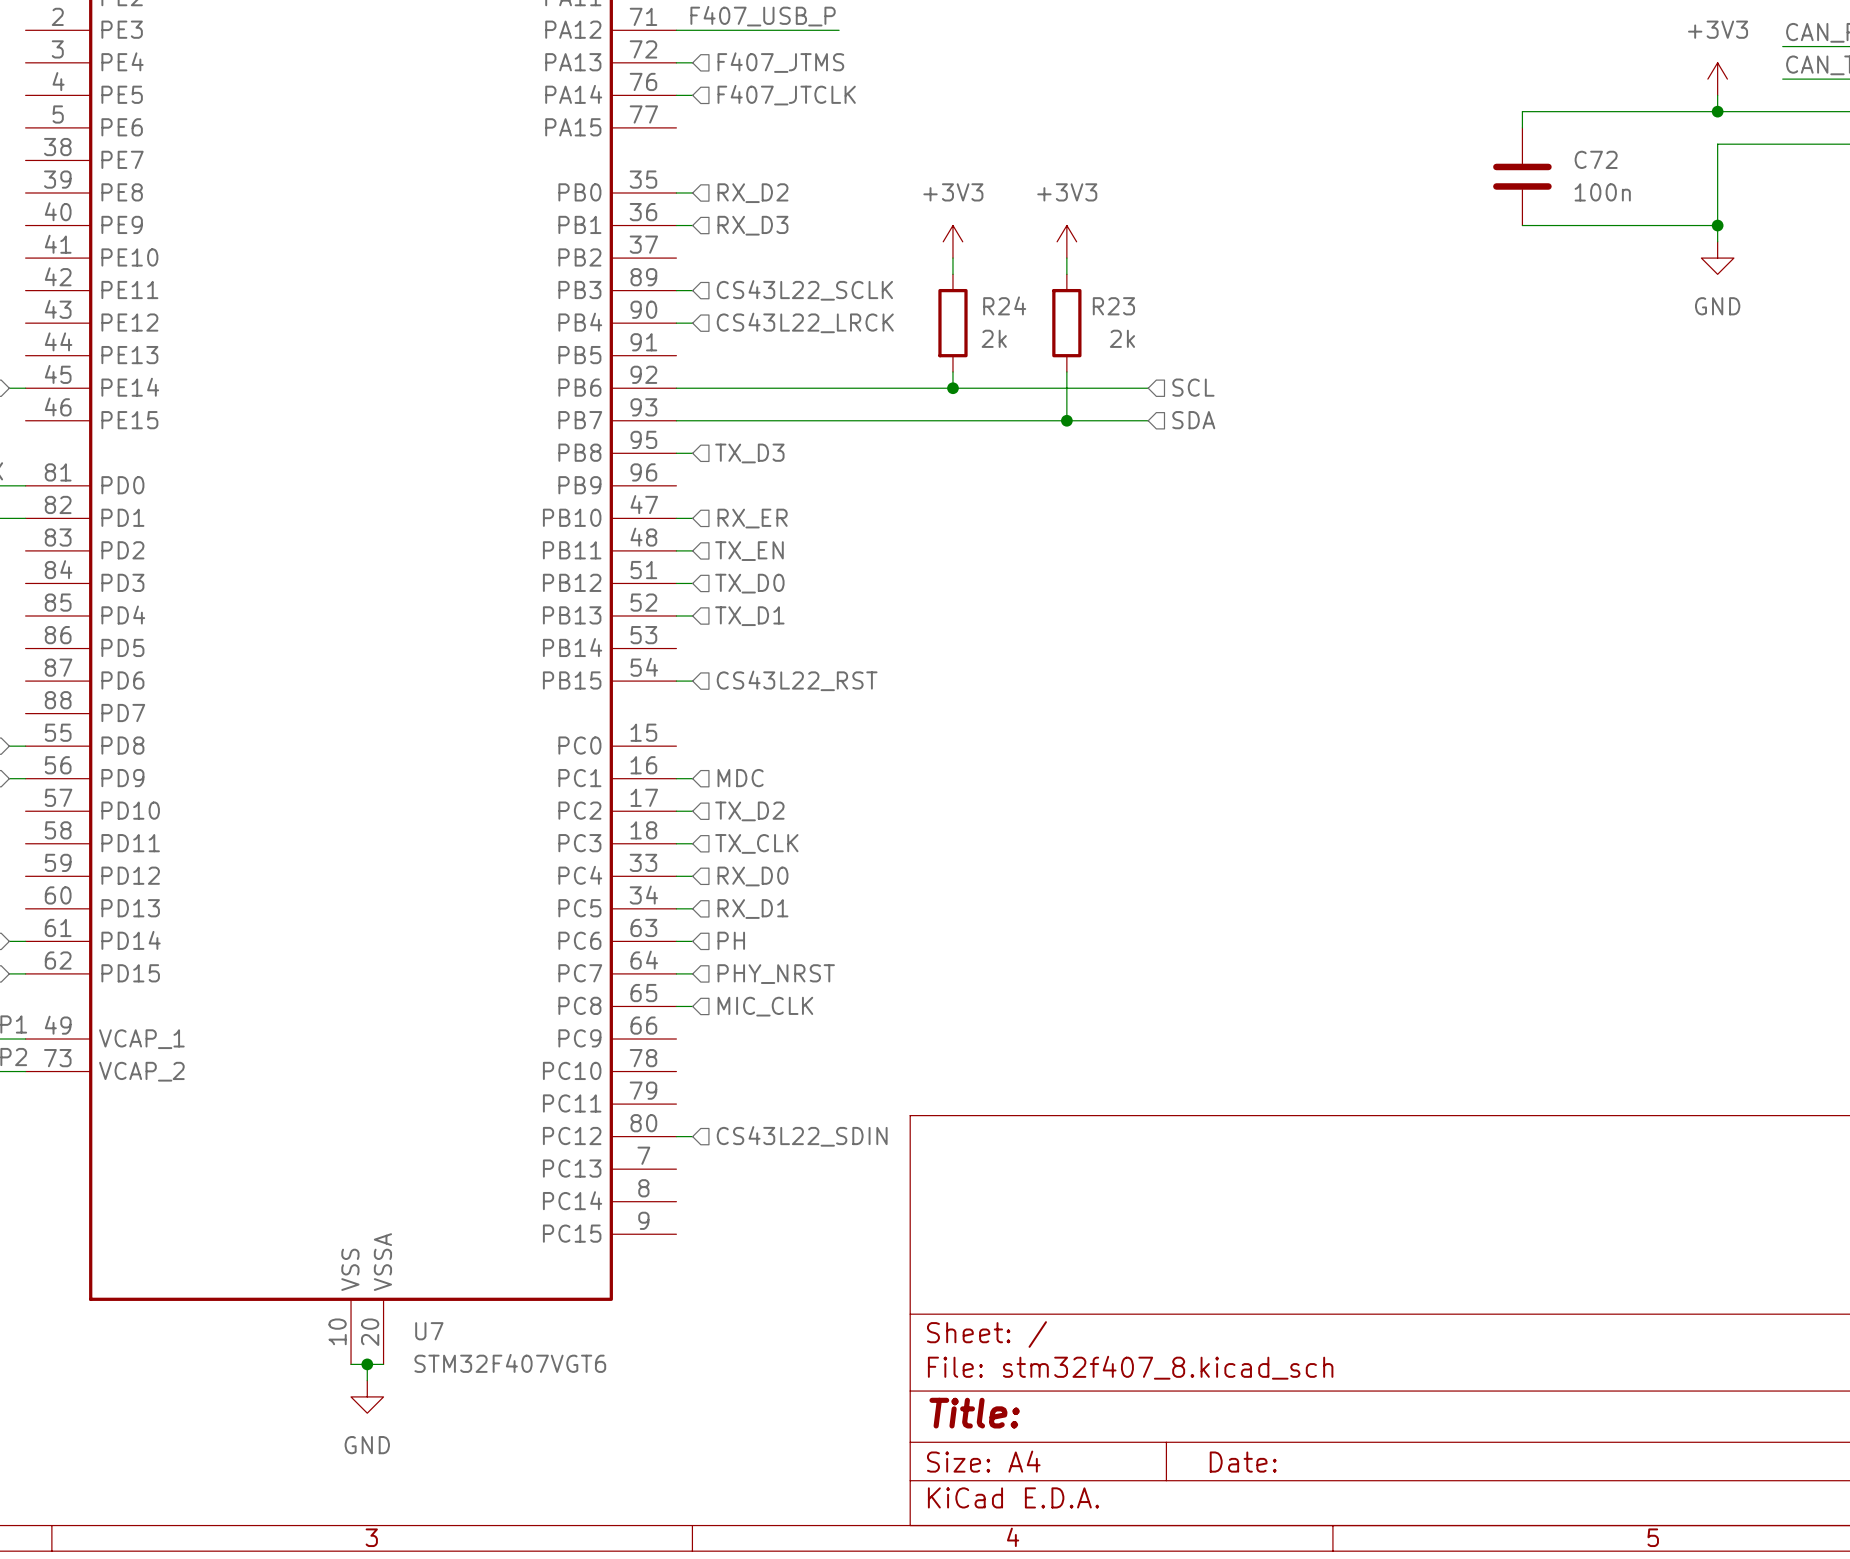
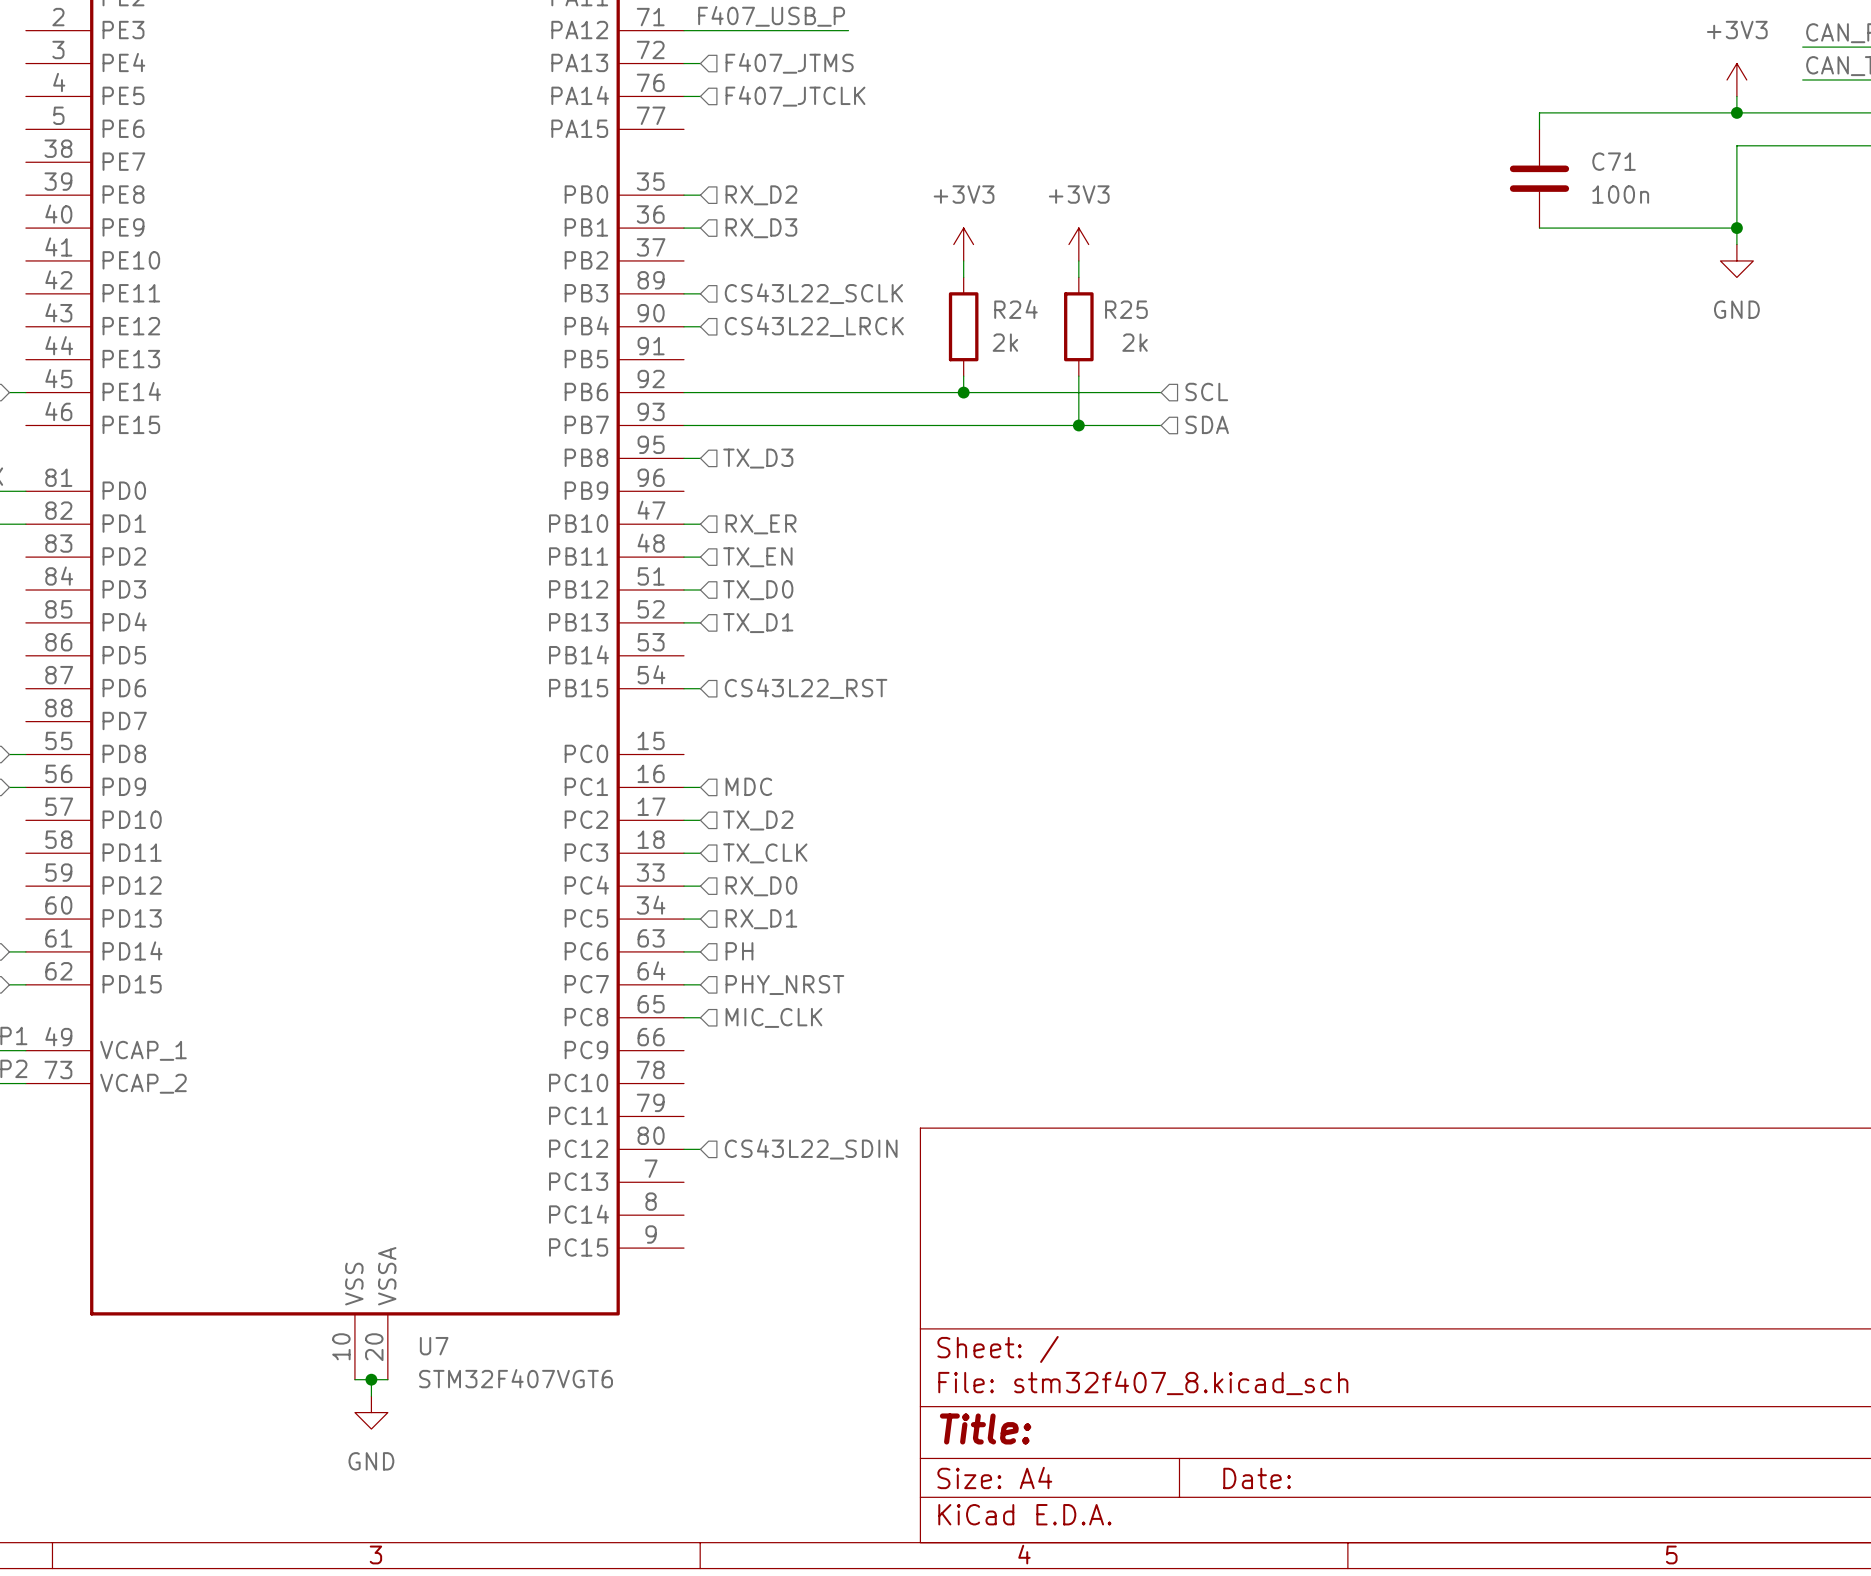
C72 name: C72 (1596, 159) -> C71 (1614, 161)
R23 name: R23 (1113, 306) -> R25 (1126, 309)

